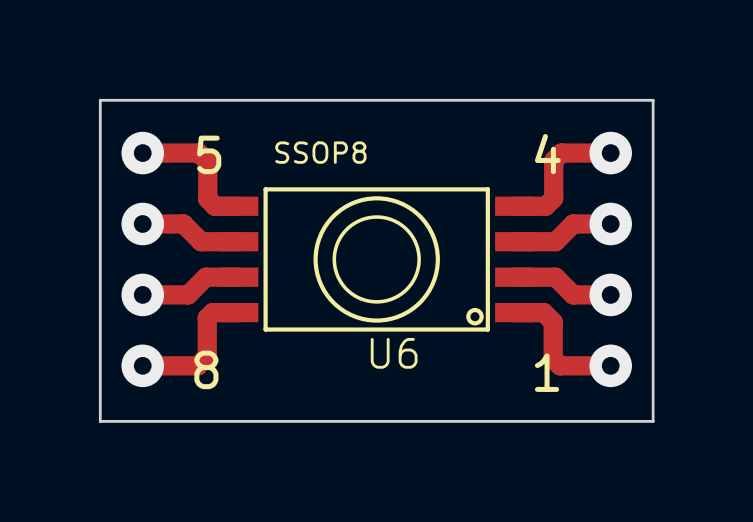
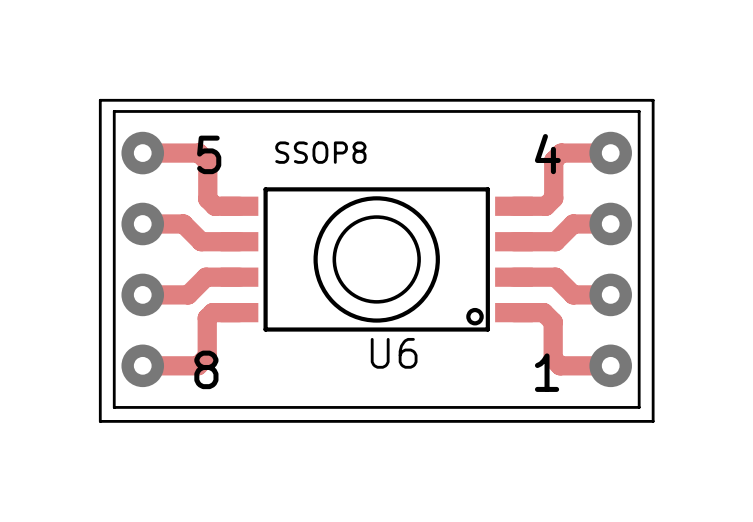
board edge: none -> (114, 111) (114, 407) (639, 407) (639, 111) (114, 111)

